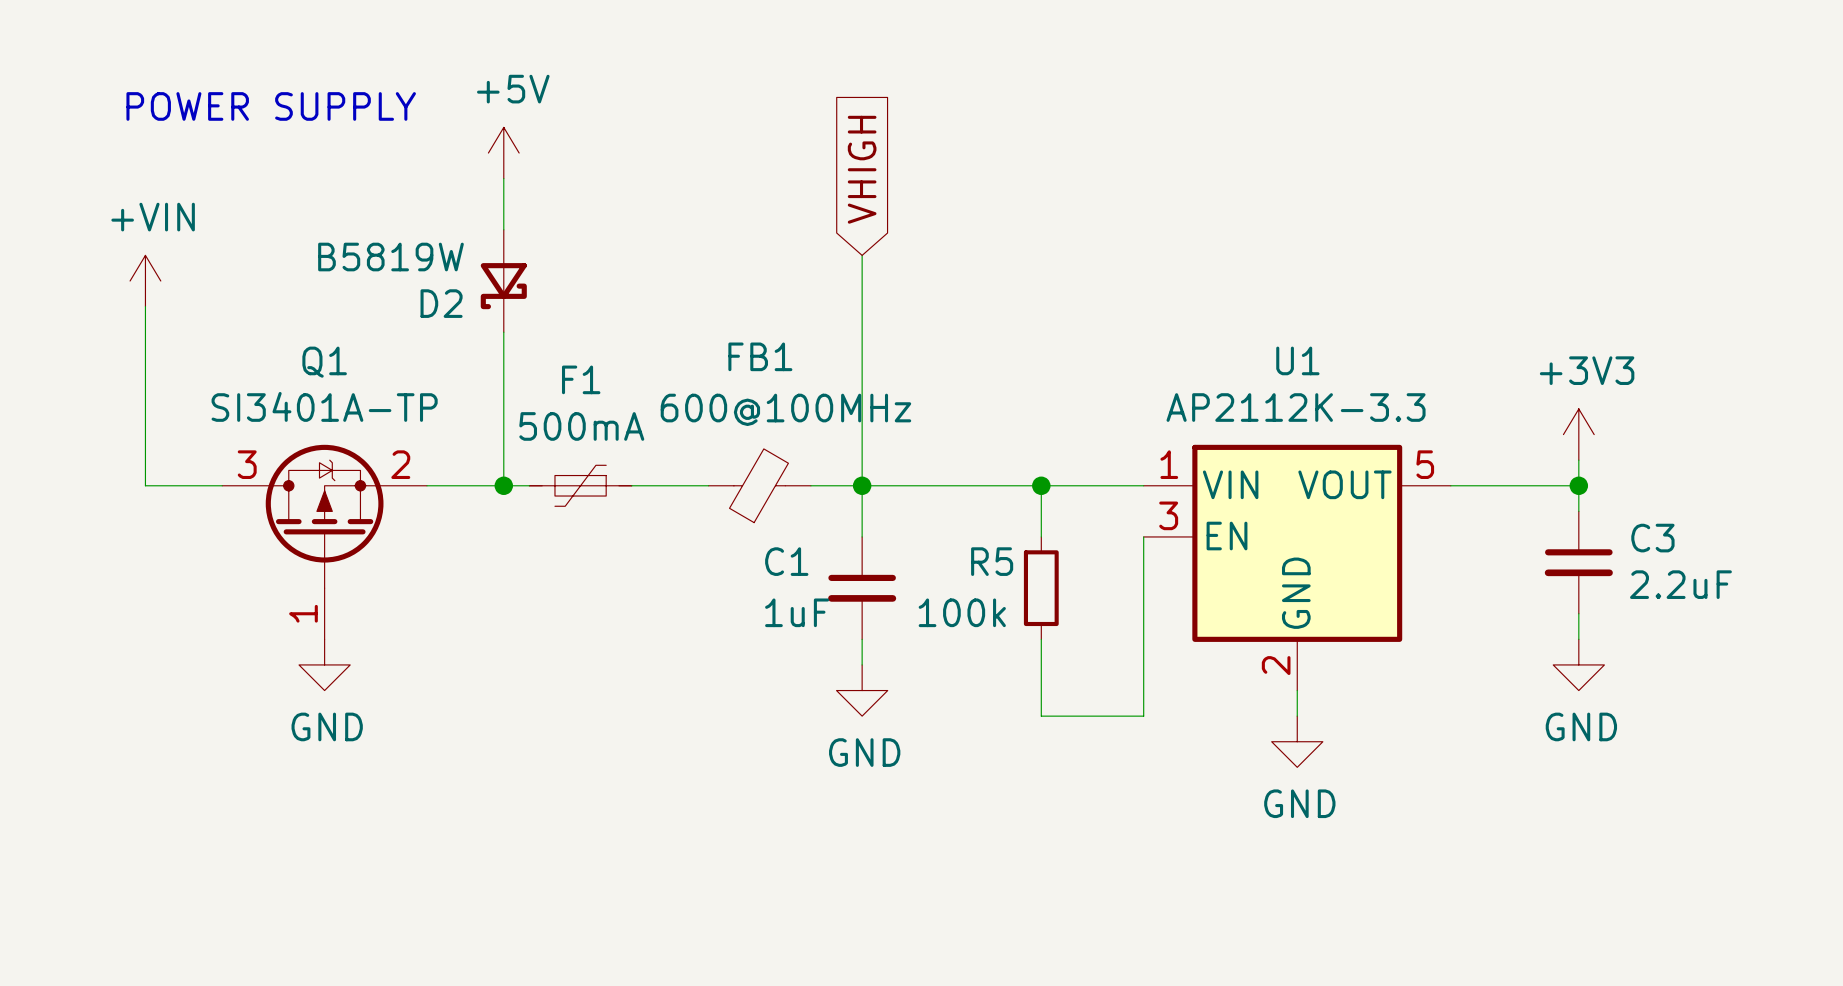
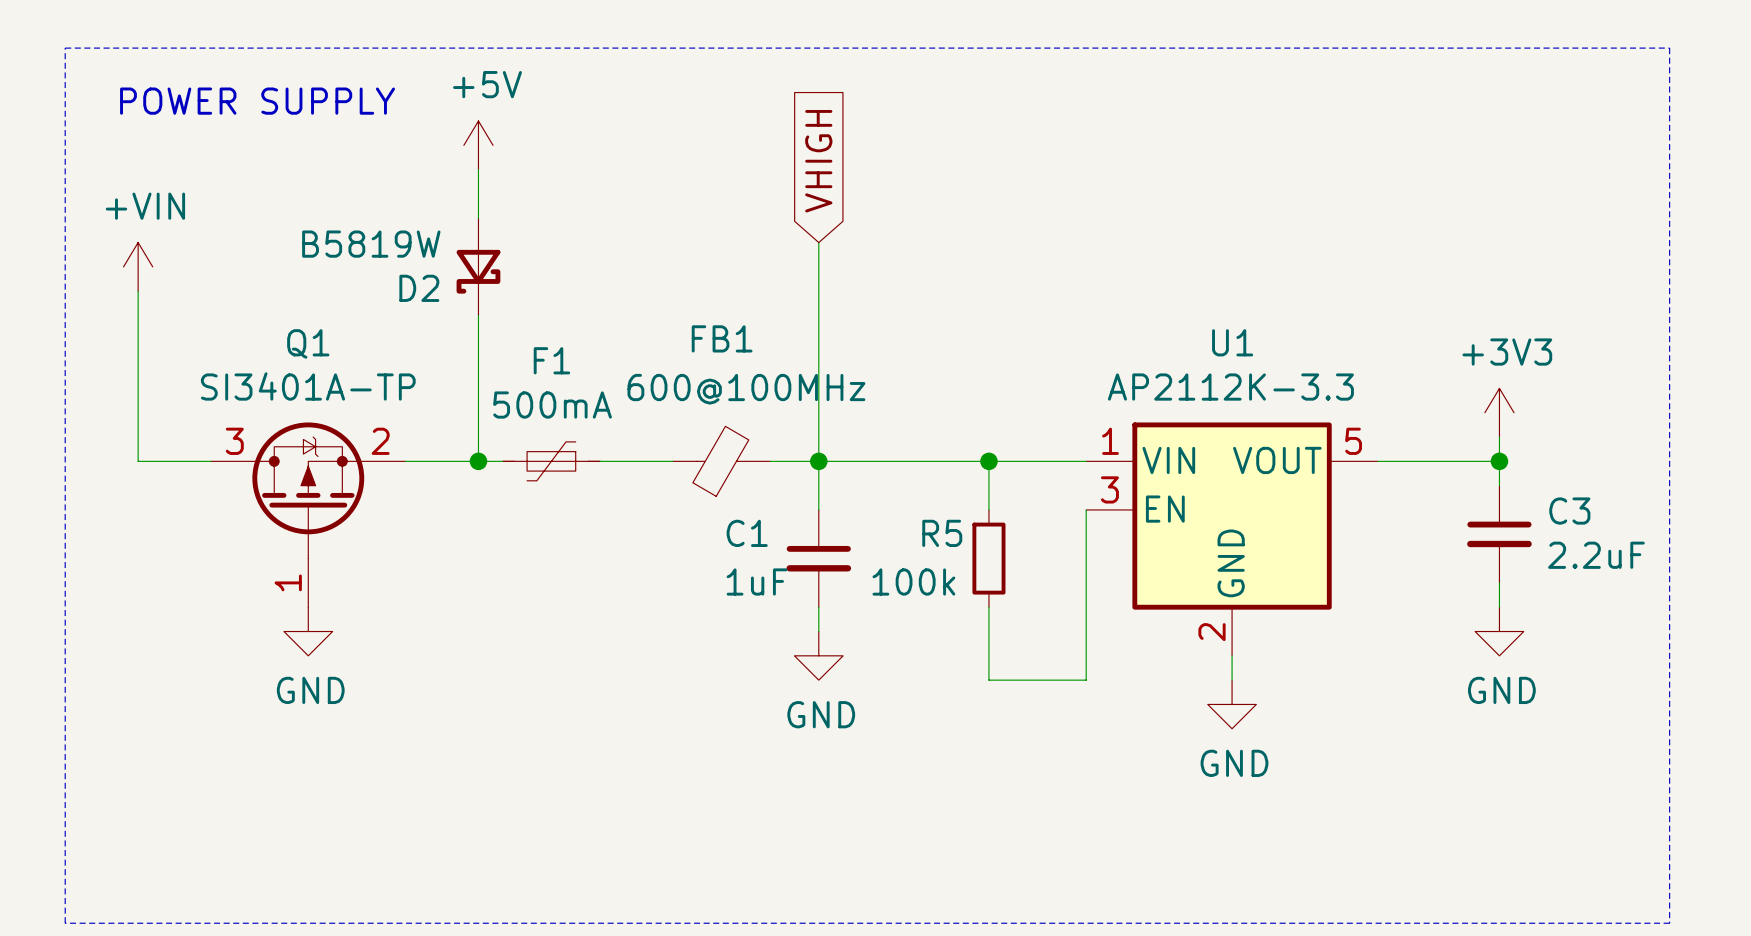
line: none -> (65, 48) (1669, 48) (1669, 923) (65, 923) (65, 48)

